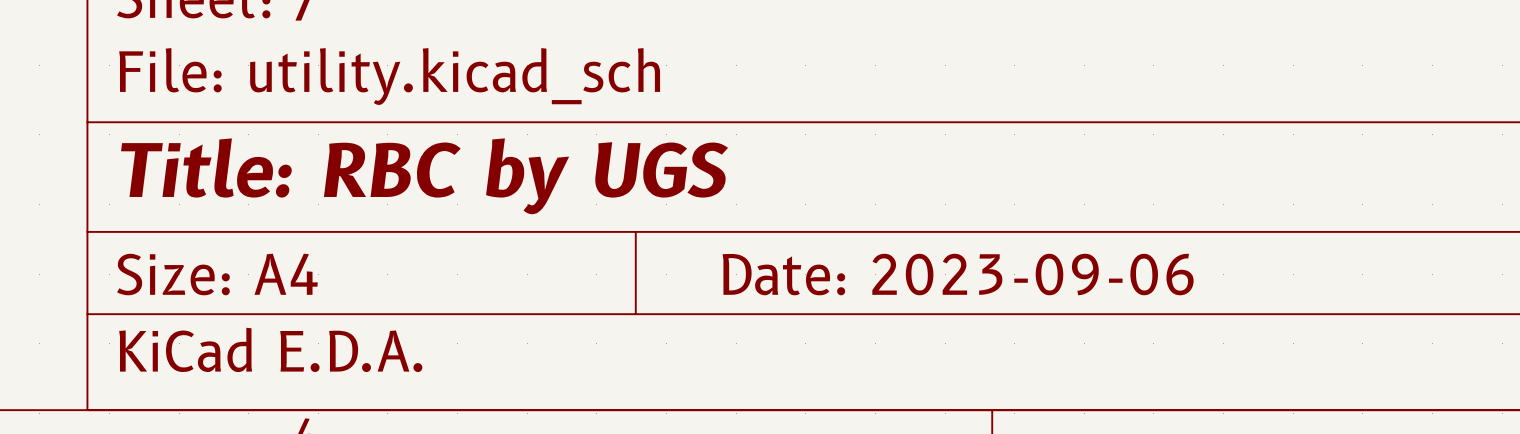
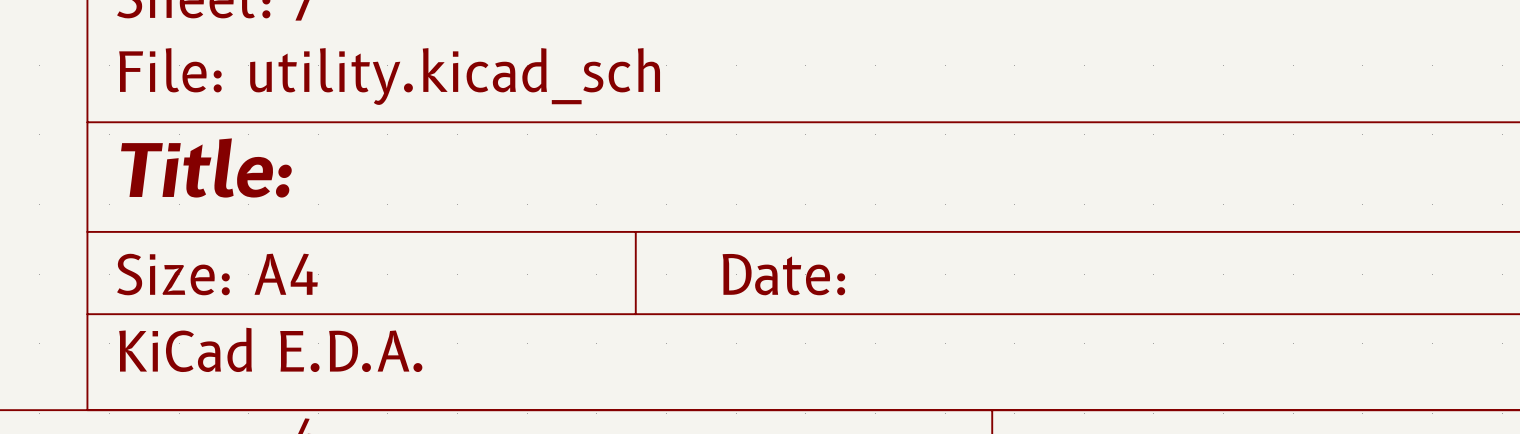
title block: Title: RBC by UGS (424, 176) -> Title: (206, 167)
title block: Date: 2023-09-06 (958, 274) -> Date: (783, 274)

